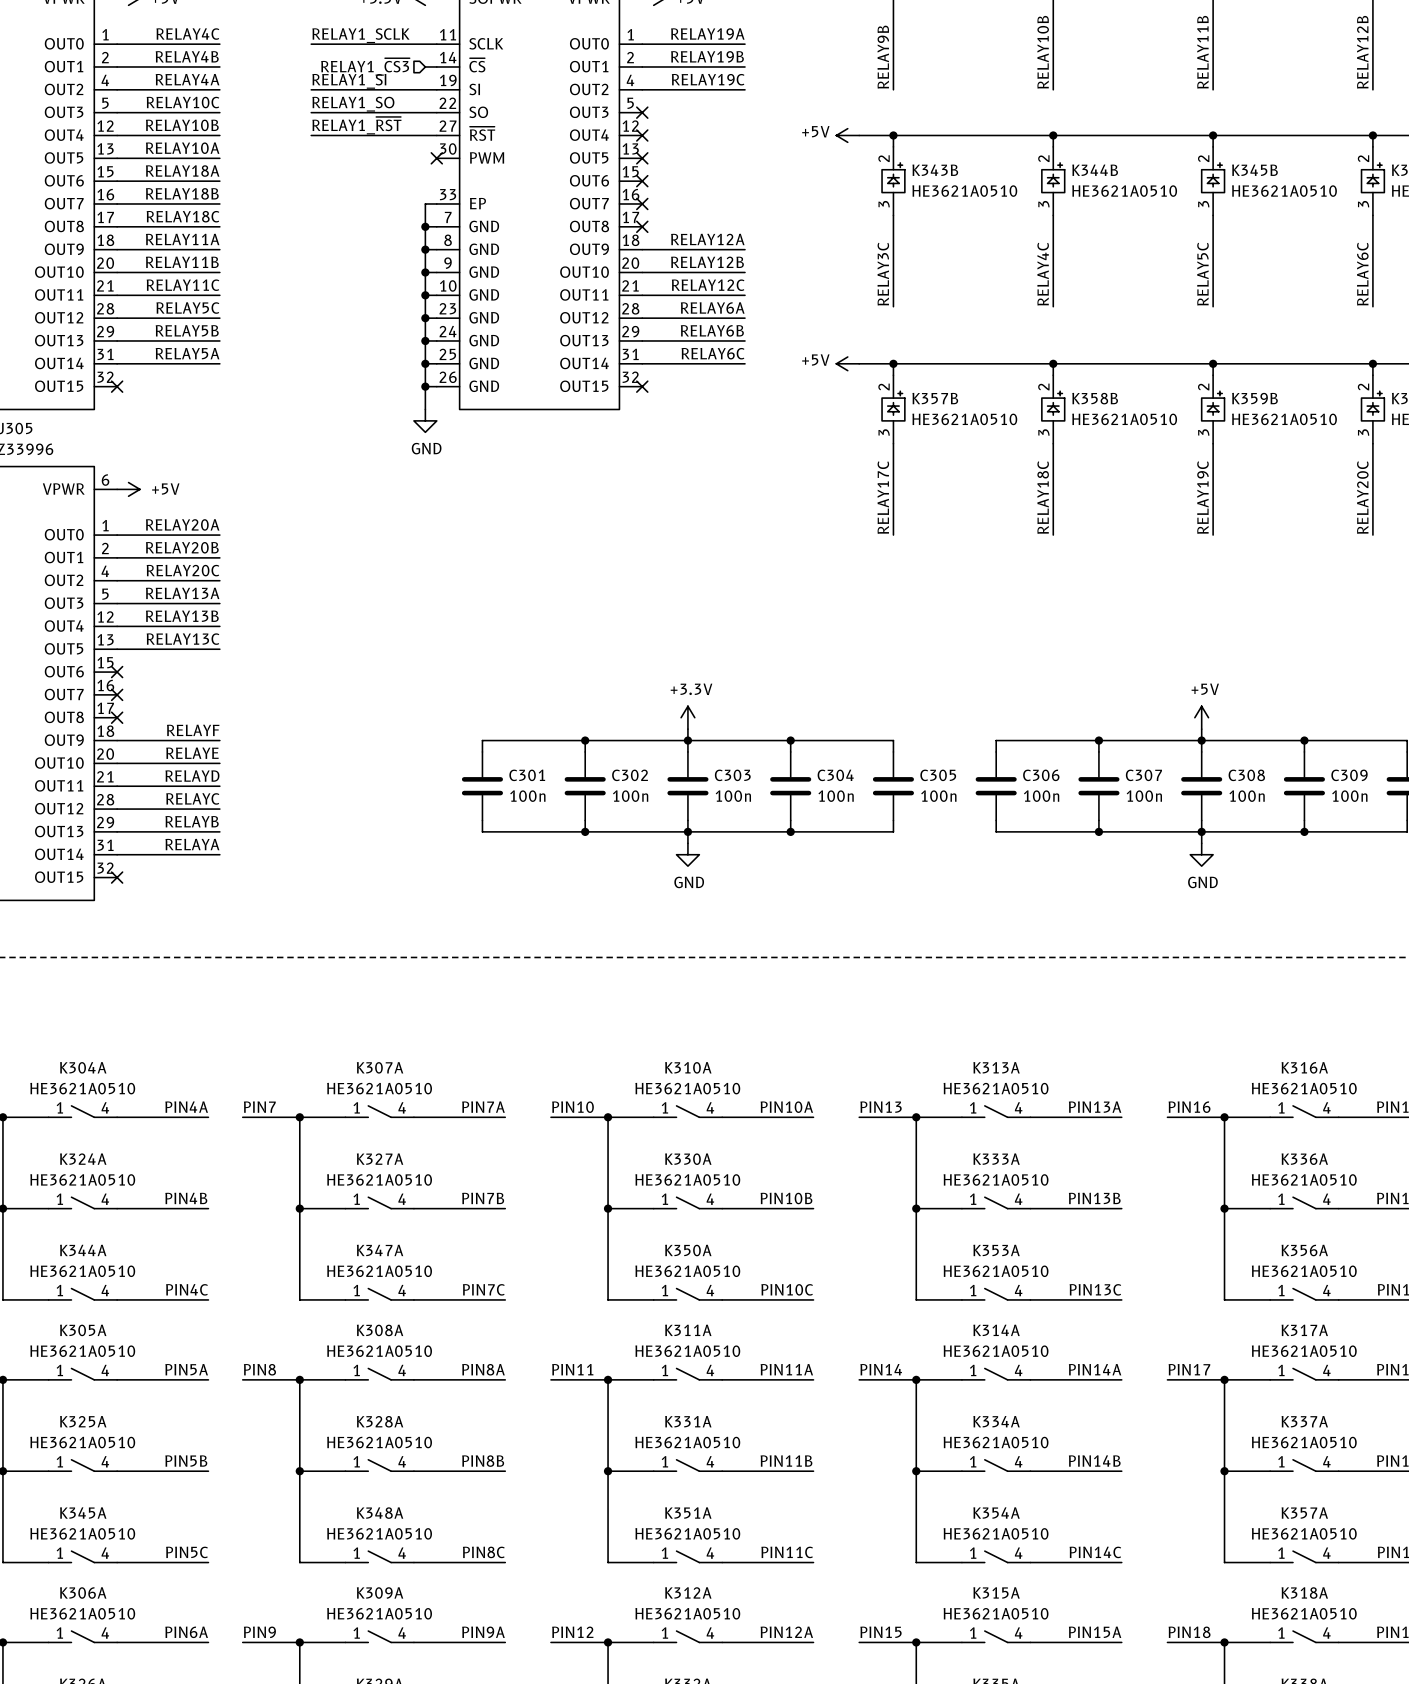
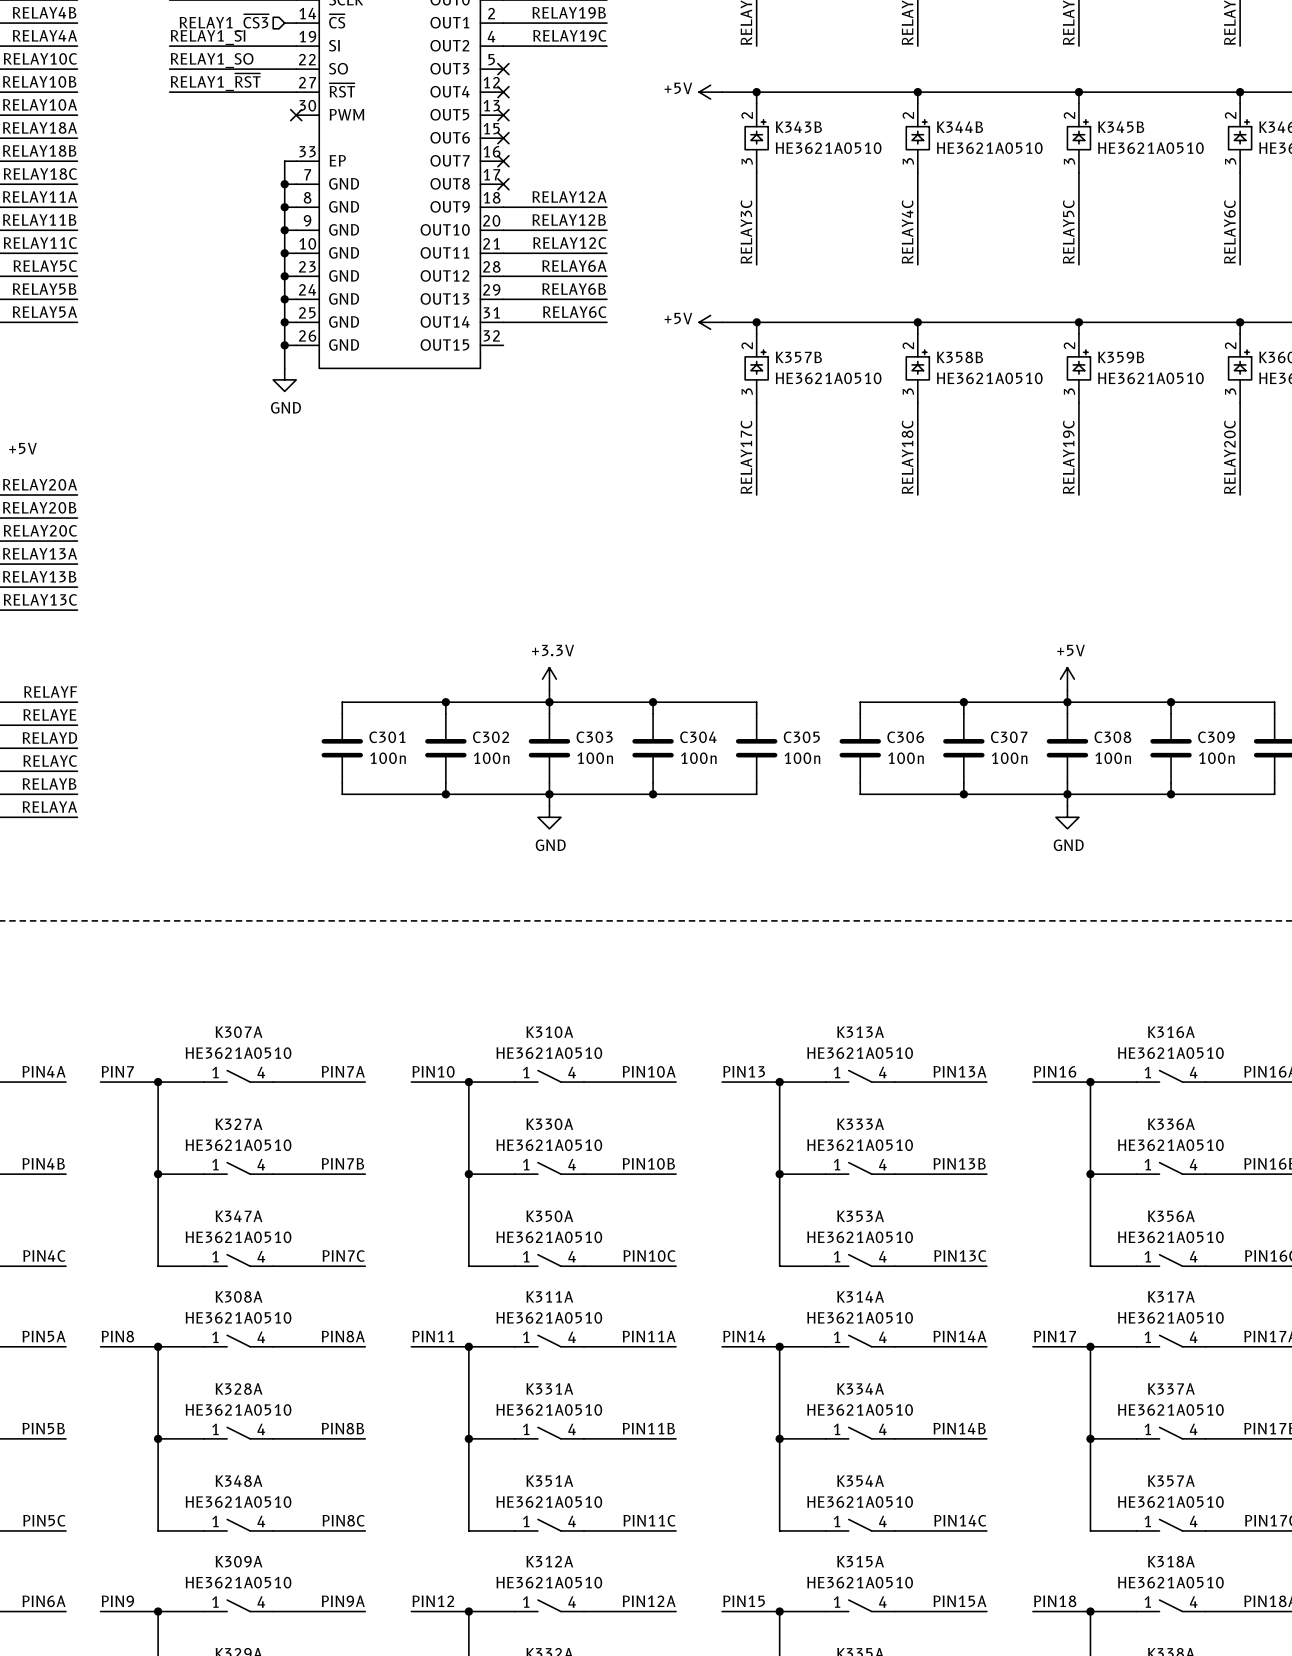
no-connect mark: (642, 386) -> none

